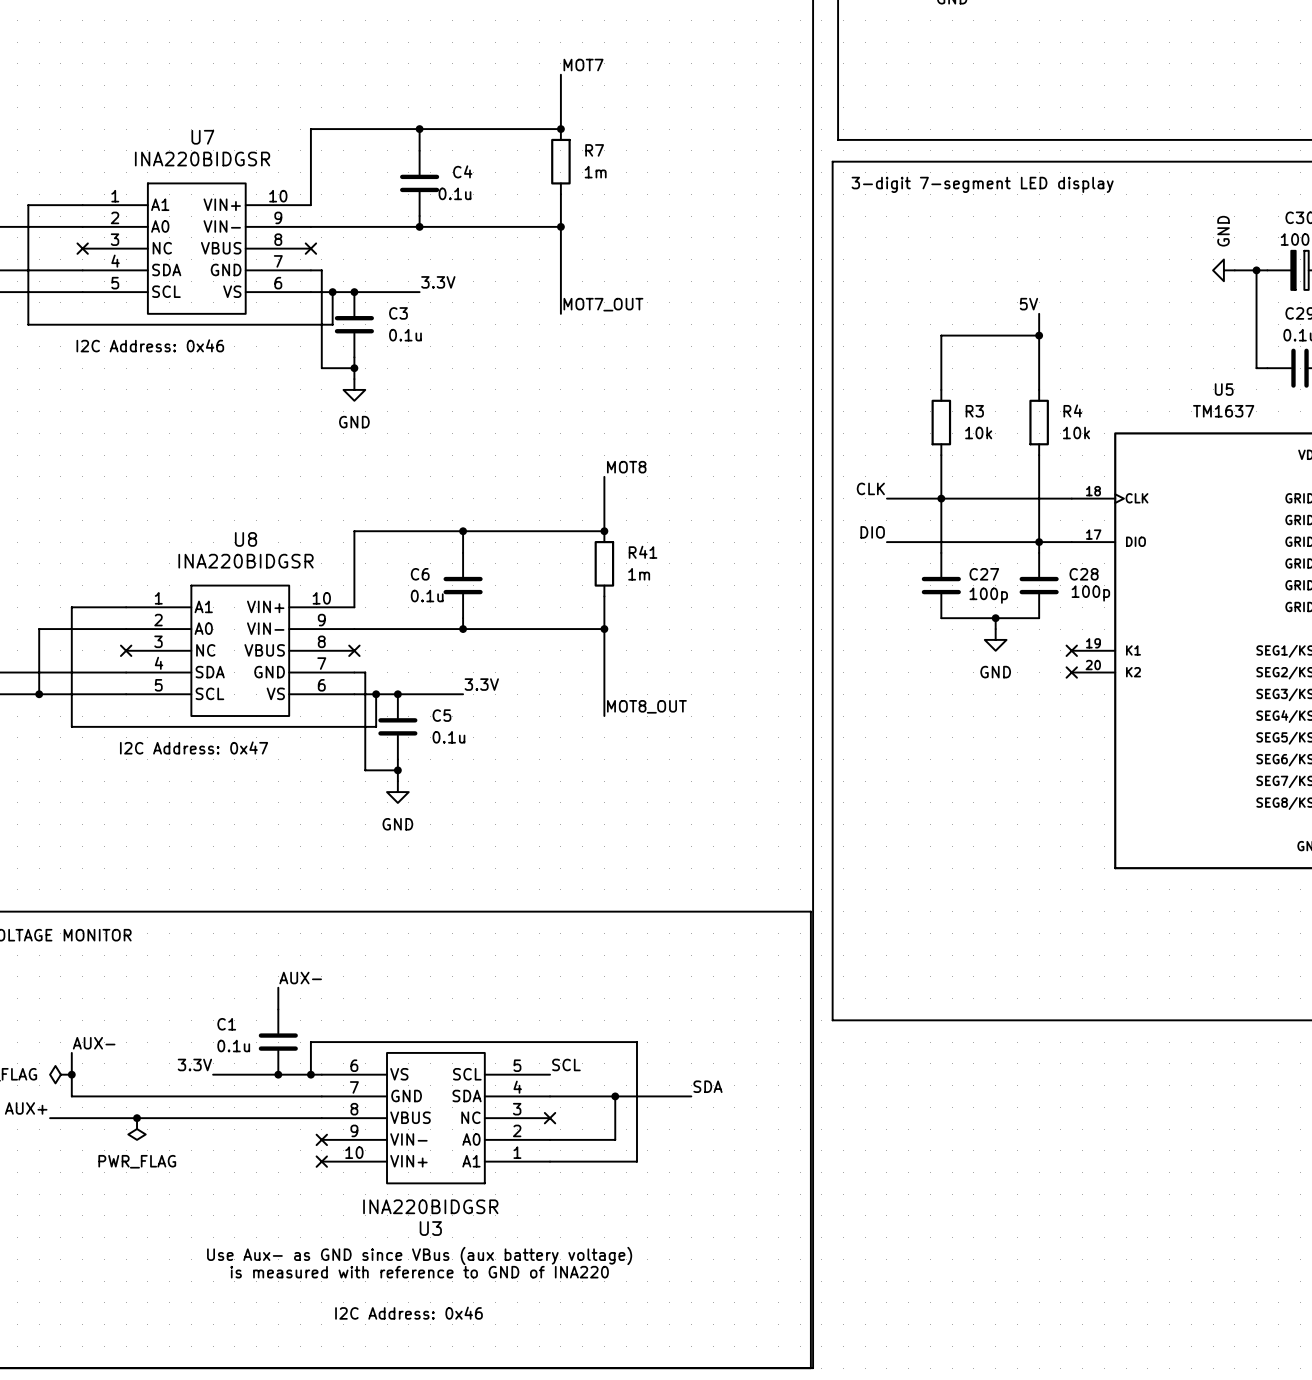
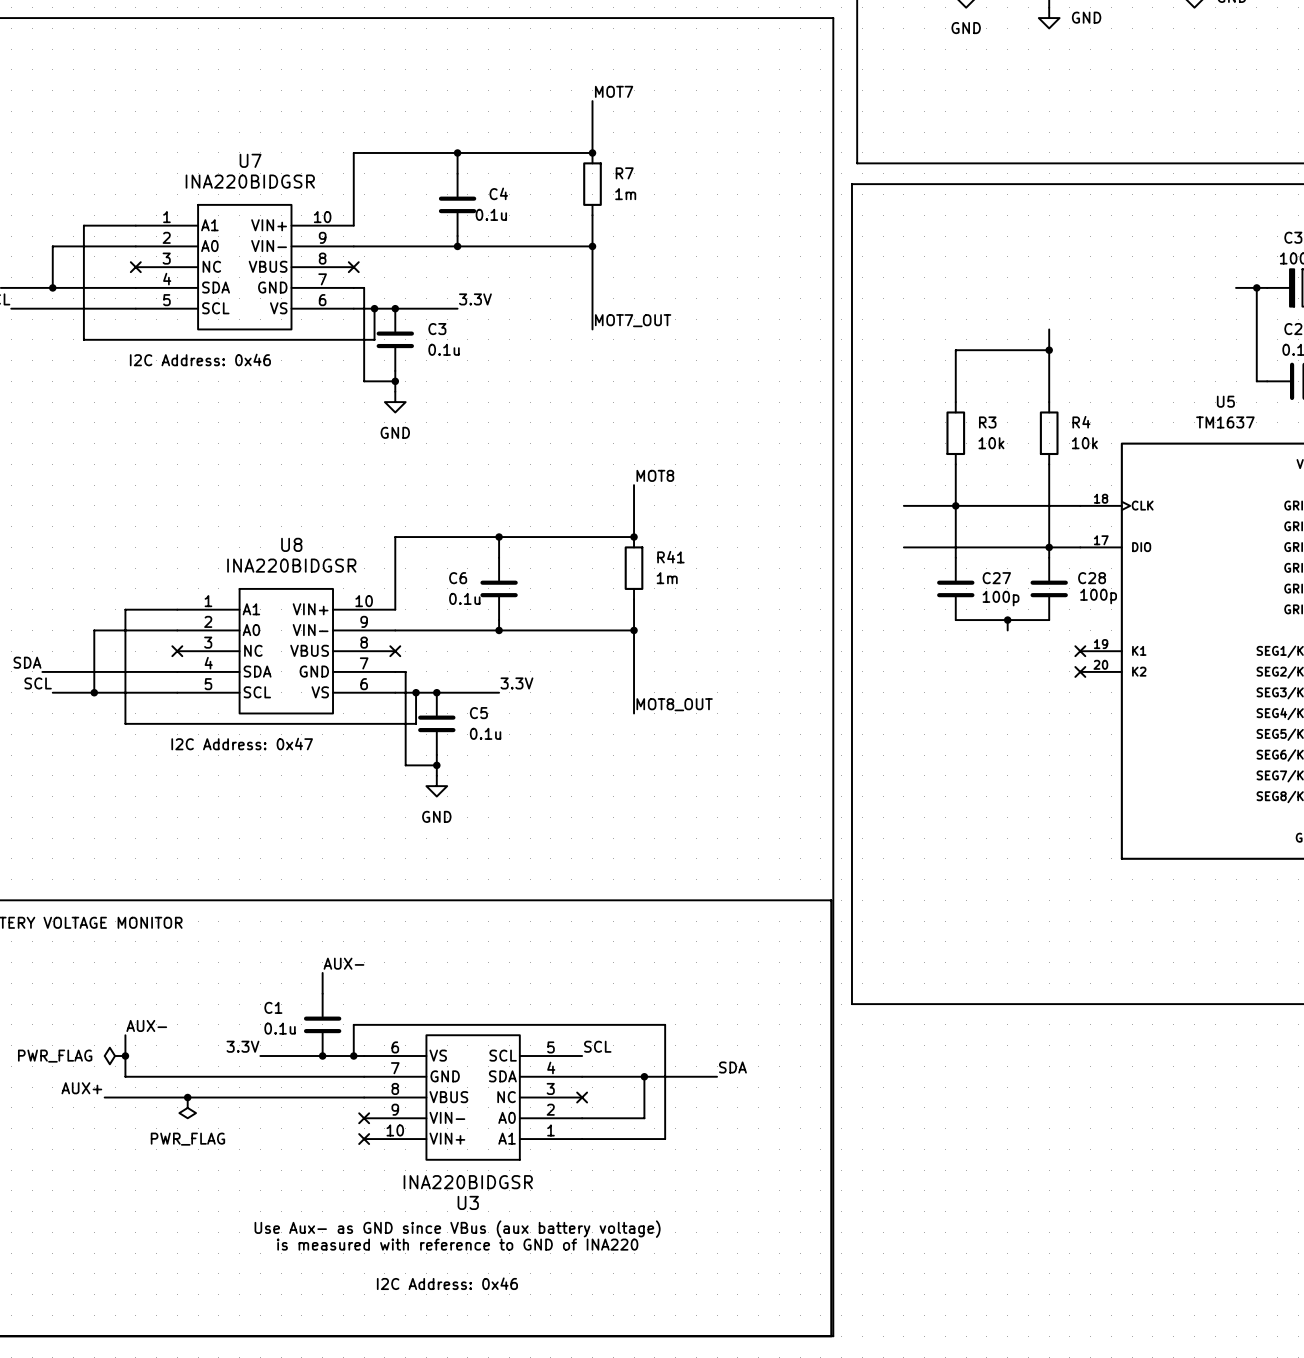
text: 3-digit 7-segment LED display (982, 184) -> none
power symbol: GND (1223, 270) -> none
label: 5V (1028, 304) -> none
label: CLK (870, 488) -> none
label: DIO (872, 532) -> none
power symbol: GND (995, 639) -> none

